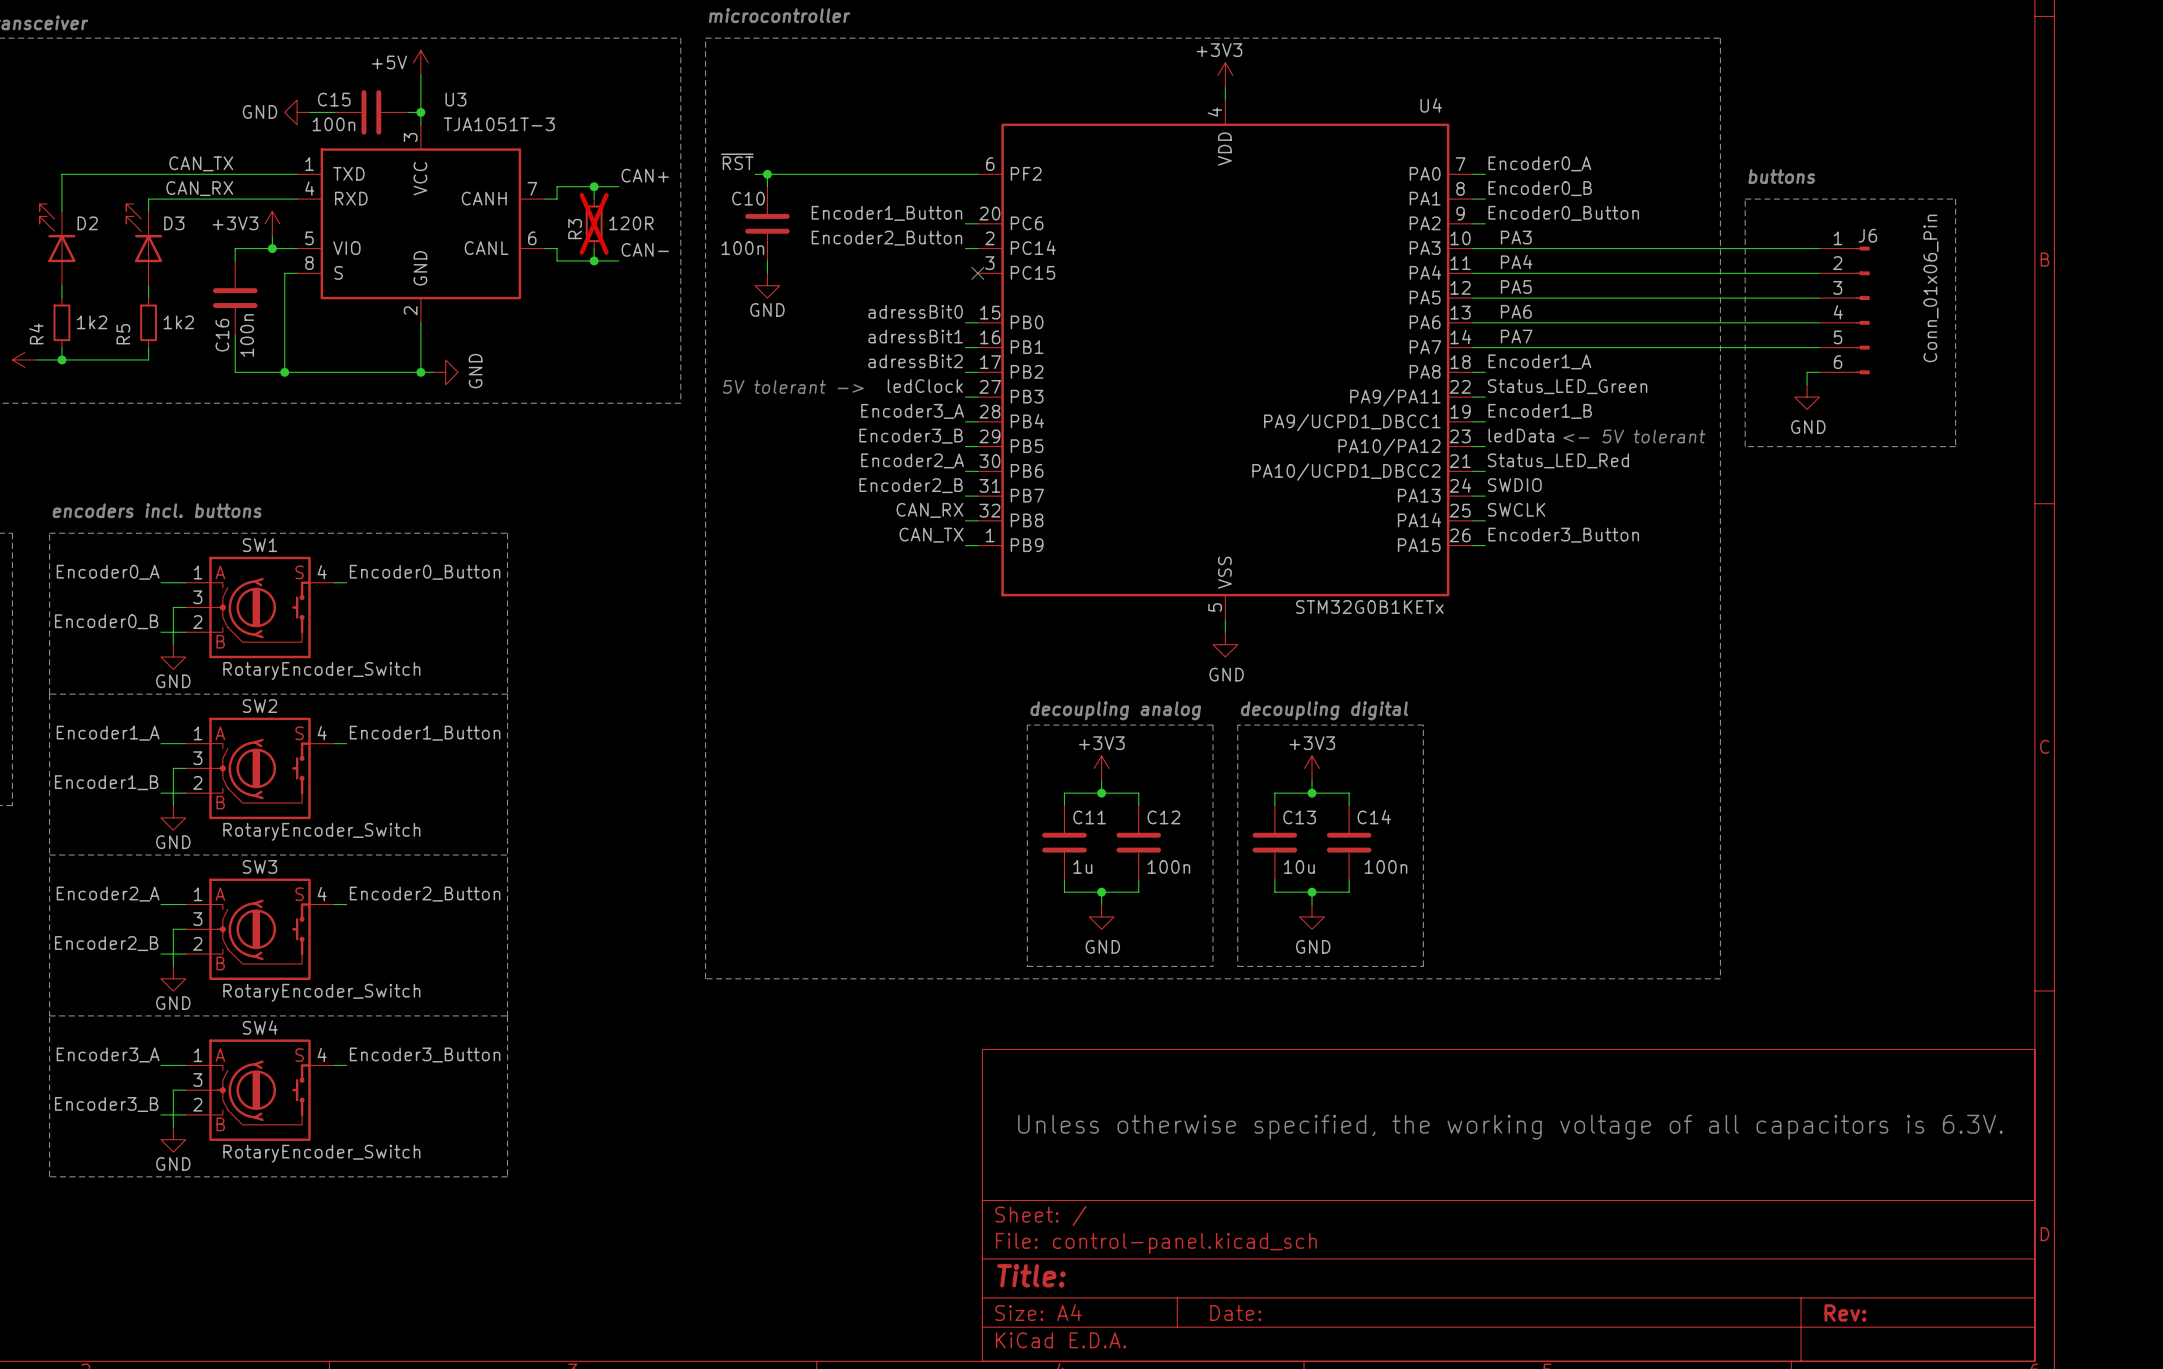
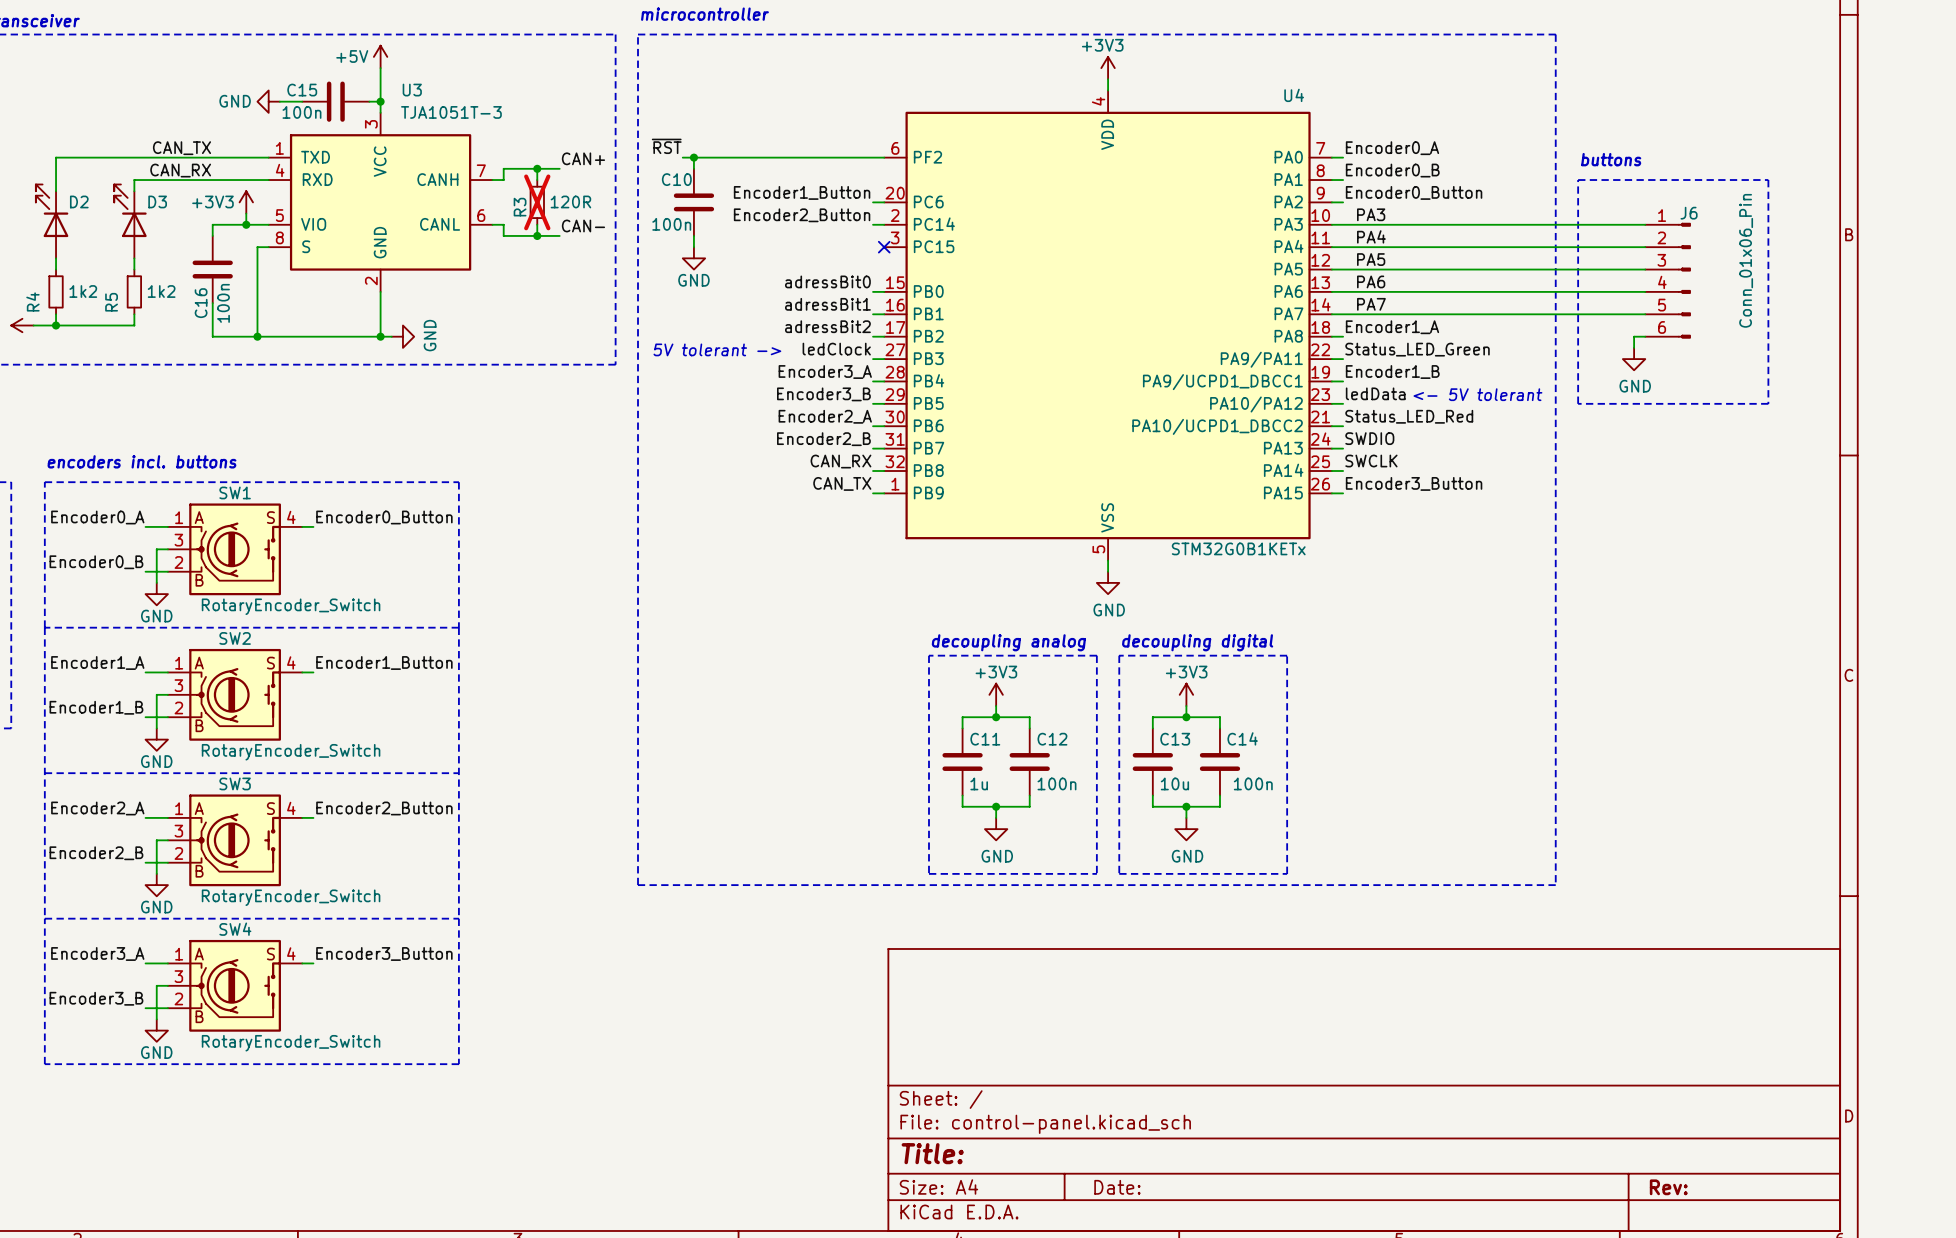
text: Unless otherwise specified, the working voltage of all capacitors is 6.3V. (1510, 1127) -> none

